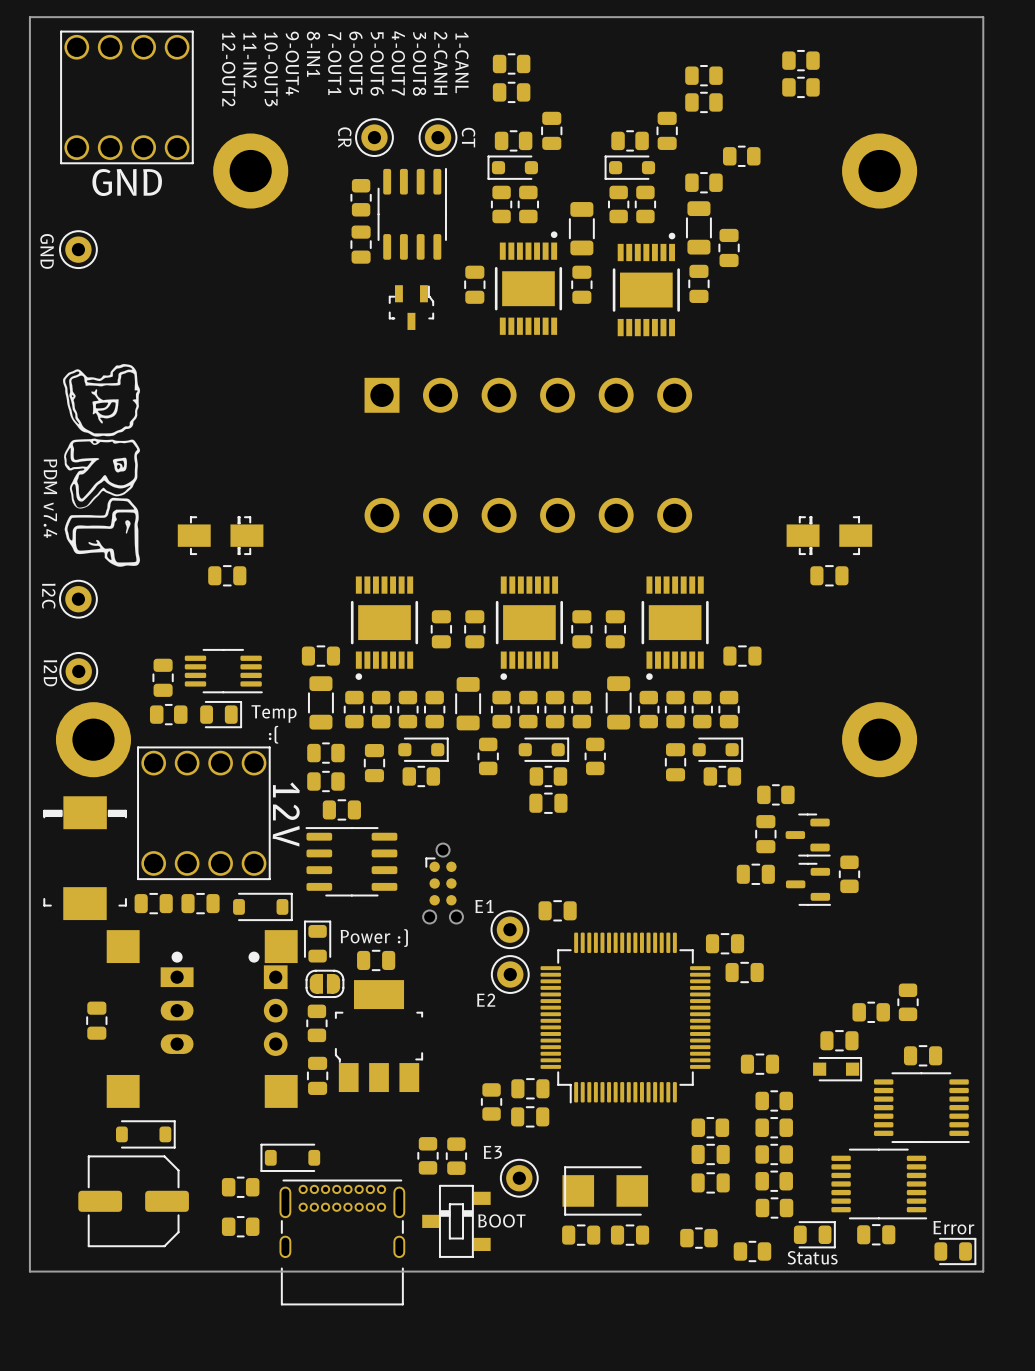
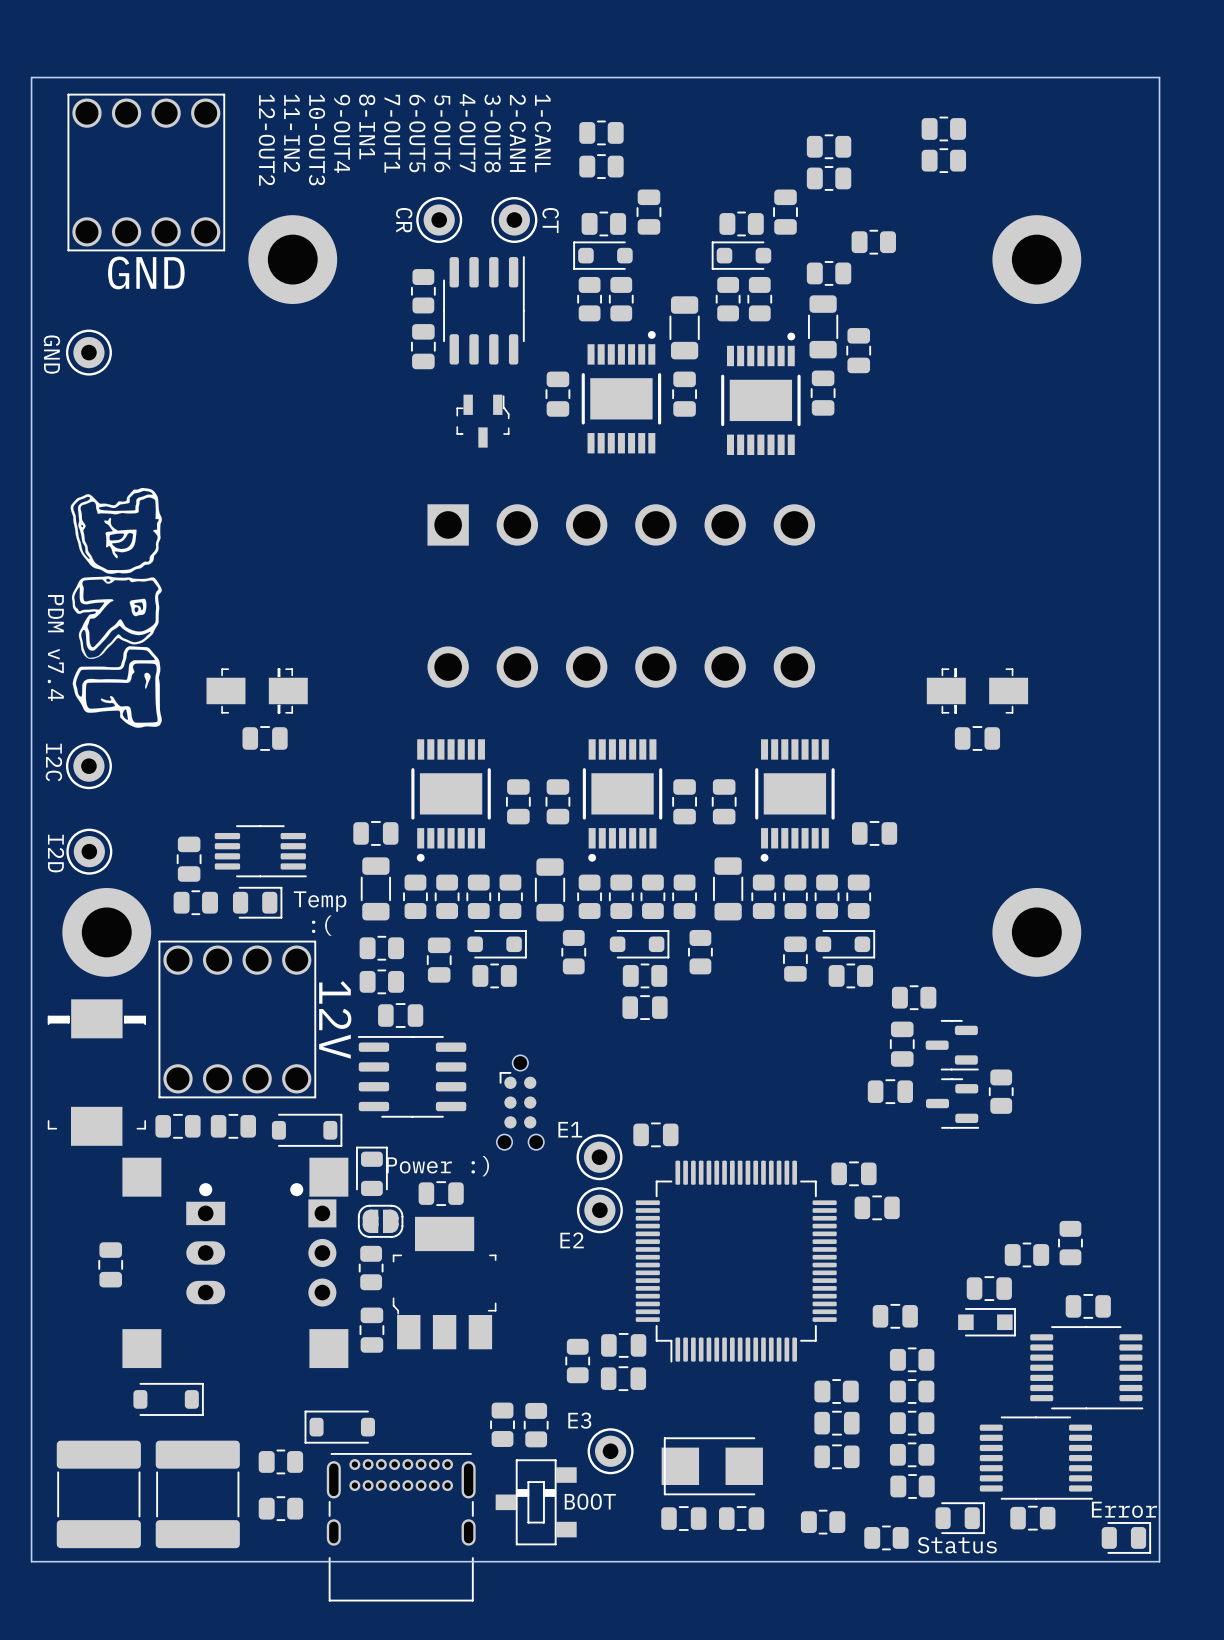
part: (133, 1201) -> none
part: none -> (98, 1494)
part: none -> (197, 1494)

